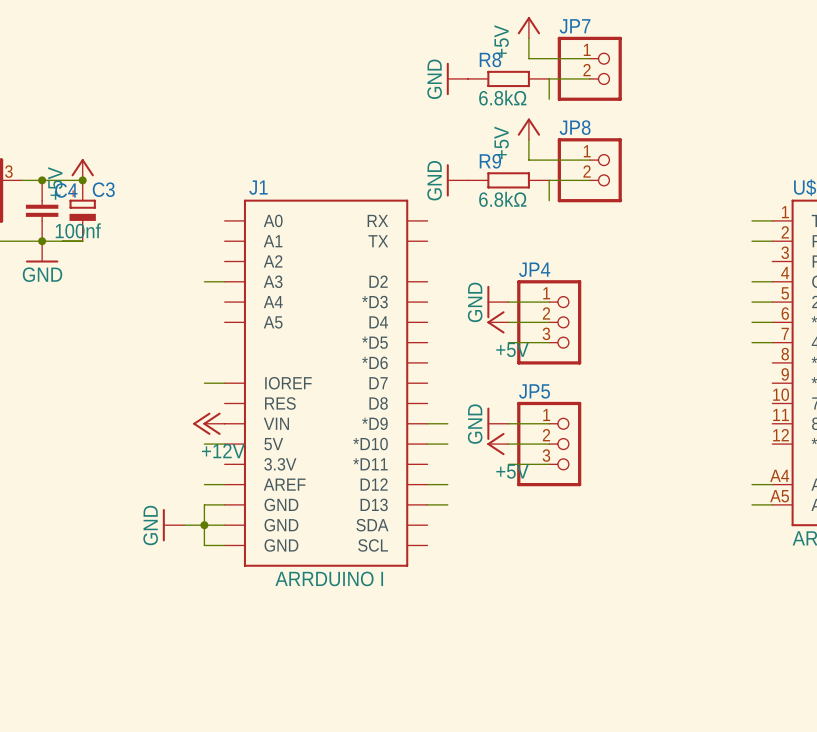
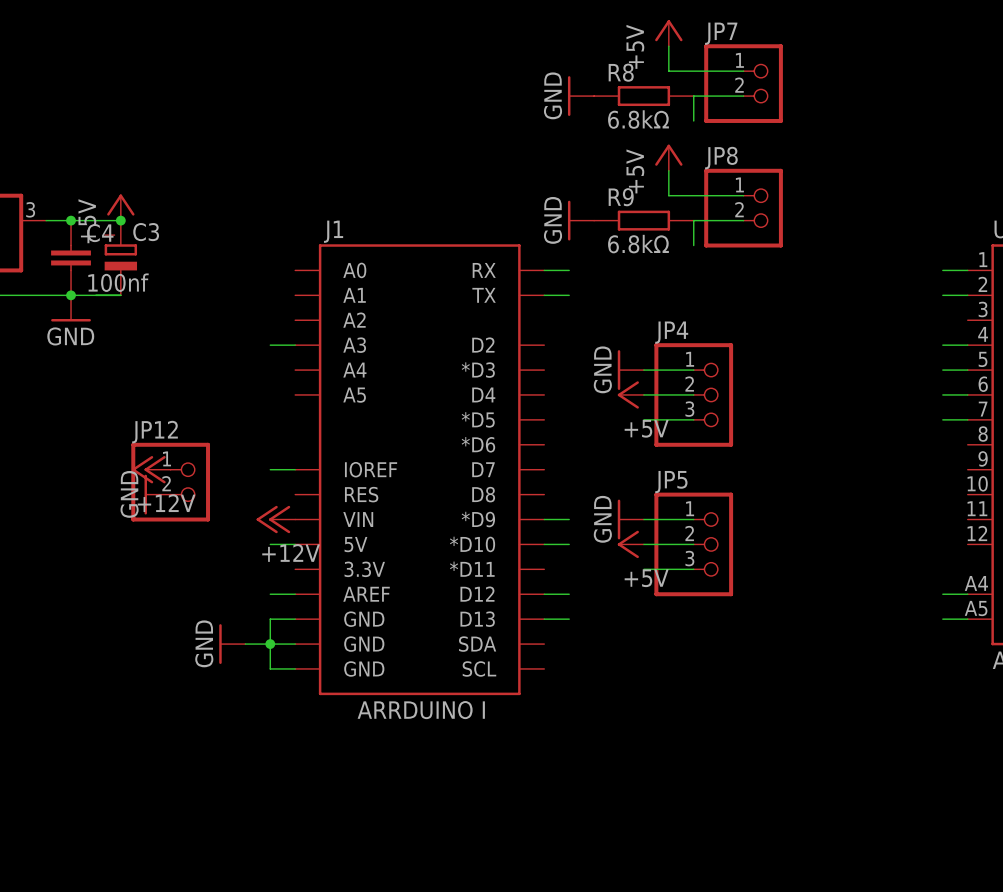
wire: none -> (544, 270) (569, 270)
wire: none -> (544, 295) (569, 295)
power symbol: none -> +12V (151, 469)
JP12: none -> (170, 482)
power symbol: none -> GND (157, 494)

